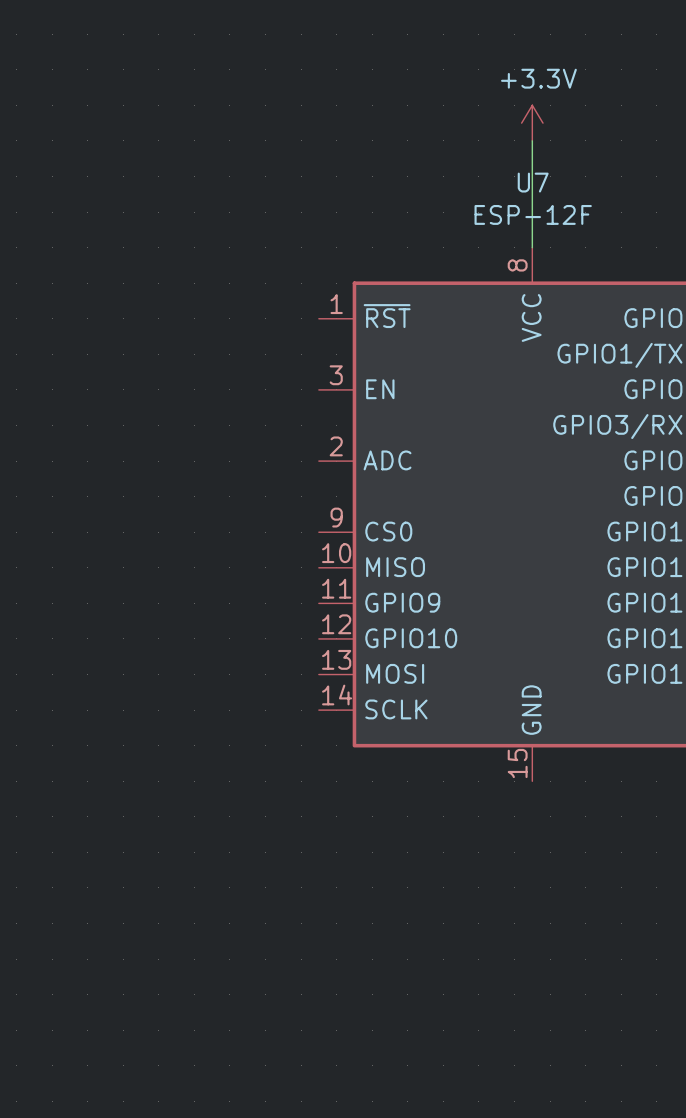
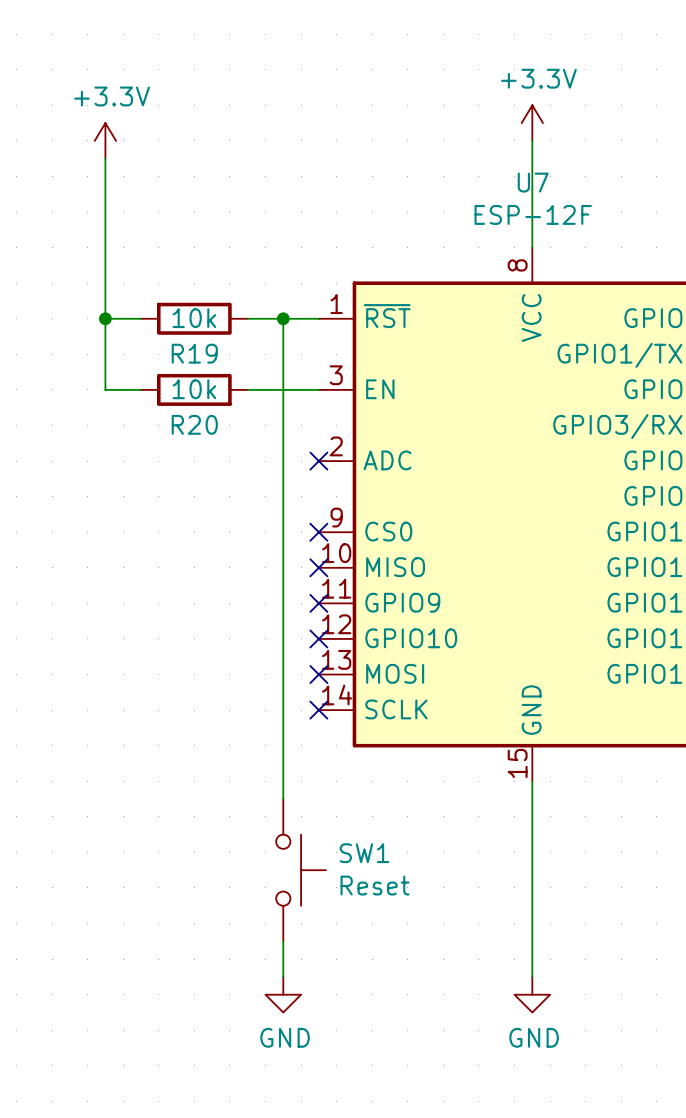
power symbol: none -> +3.3V (105, 140)
wire: none -> (105, 158) (105, 389) (140, 389)
wire: none -> (105, 318) (140, 318)
junction: none -> (105, 318)
R19: none -> 10k (194, 318)
wire: none -> (247, 318) (318, 318)
wire: none -> (283, 318) (283, 799)
junction: none -> (283, 318)
R20: none -> 10k (194, 389)
wire: none -> (247, 389) (318, 389)
no-connect mark: none -> (318, 461)
no-connect mark: none -> (318, 532)
no-connect mark: none -> (318, 567)
no-connect mark: none -> (318, 603)
no-connect mark: none -> (318, 638)
no-connect mark: none -> (318, 674)
no-connect mark: none -> (318, 710)
wire: none -> (532, 781) (532, 976)
SW1: none -> Reset (301, 870)
wire: none -> (283, 941) (283, 976)
power symbol: none -> GND (283, 994)
power symbol: none -> GND (532, 994)

